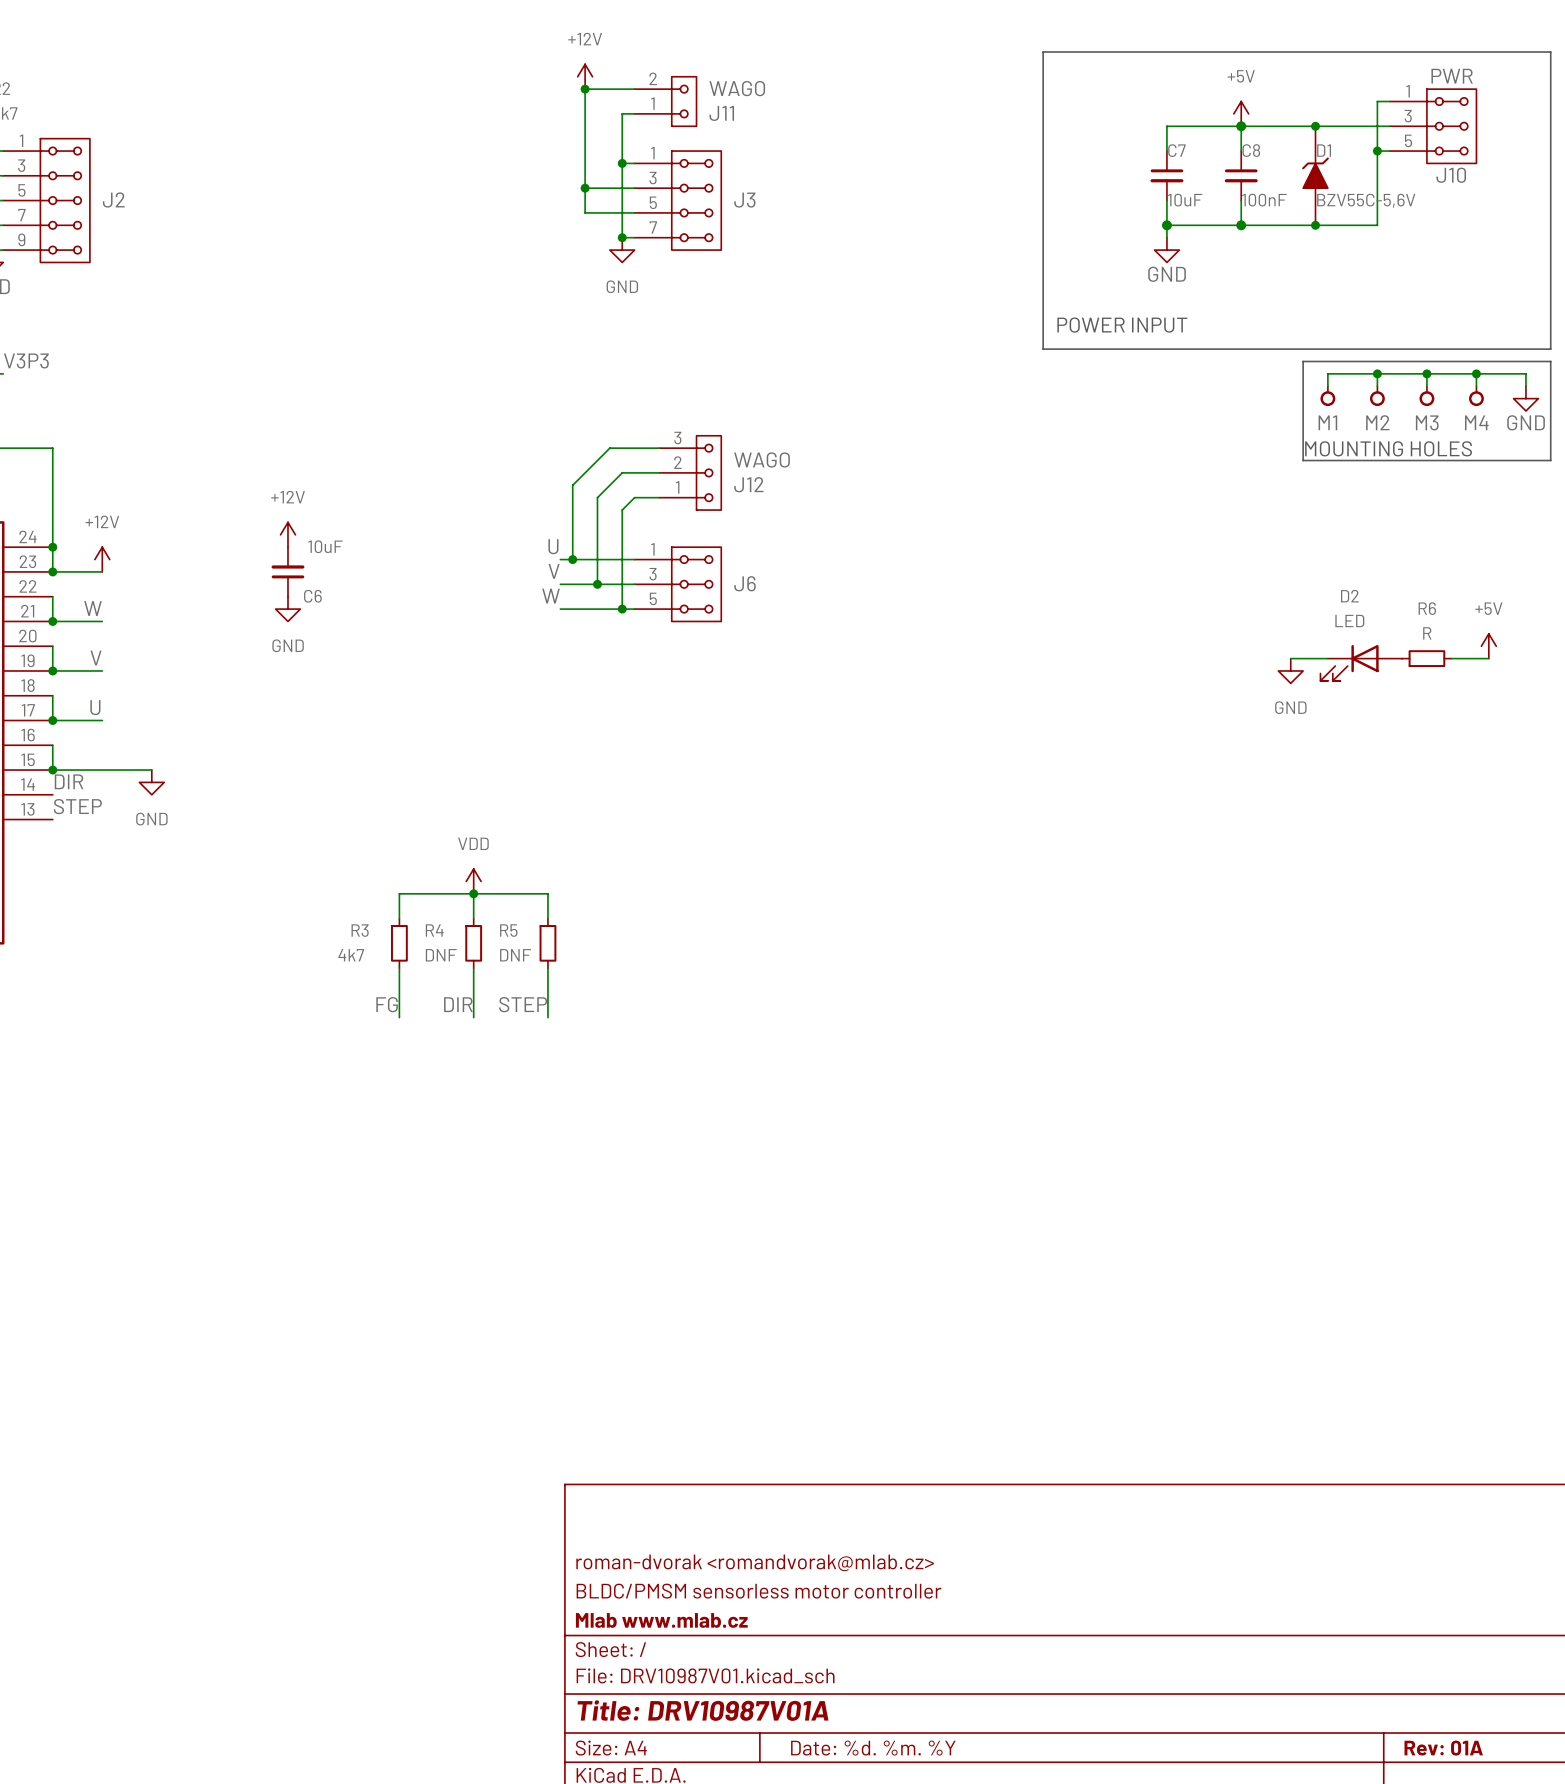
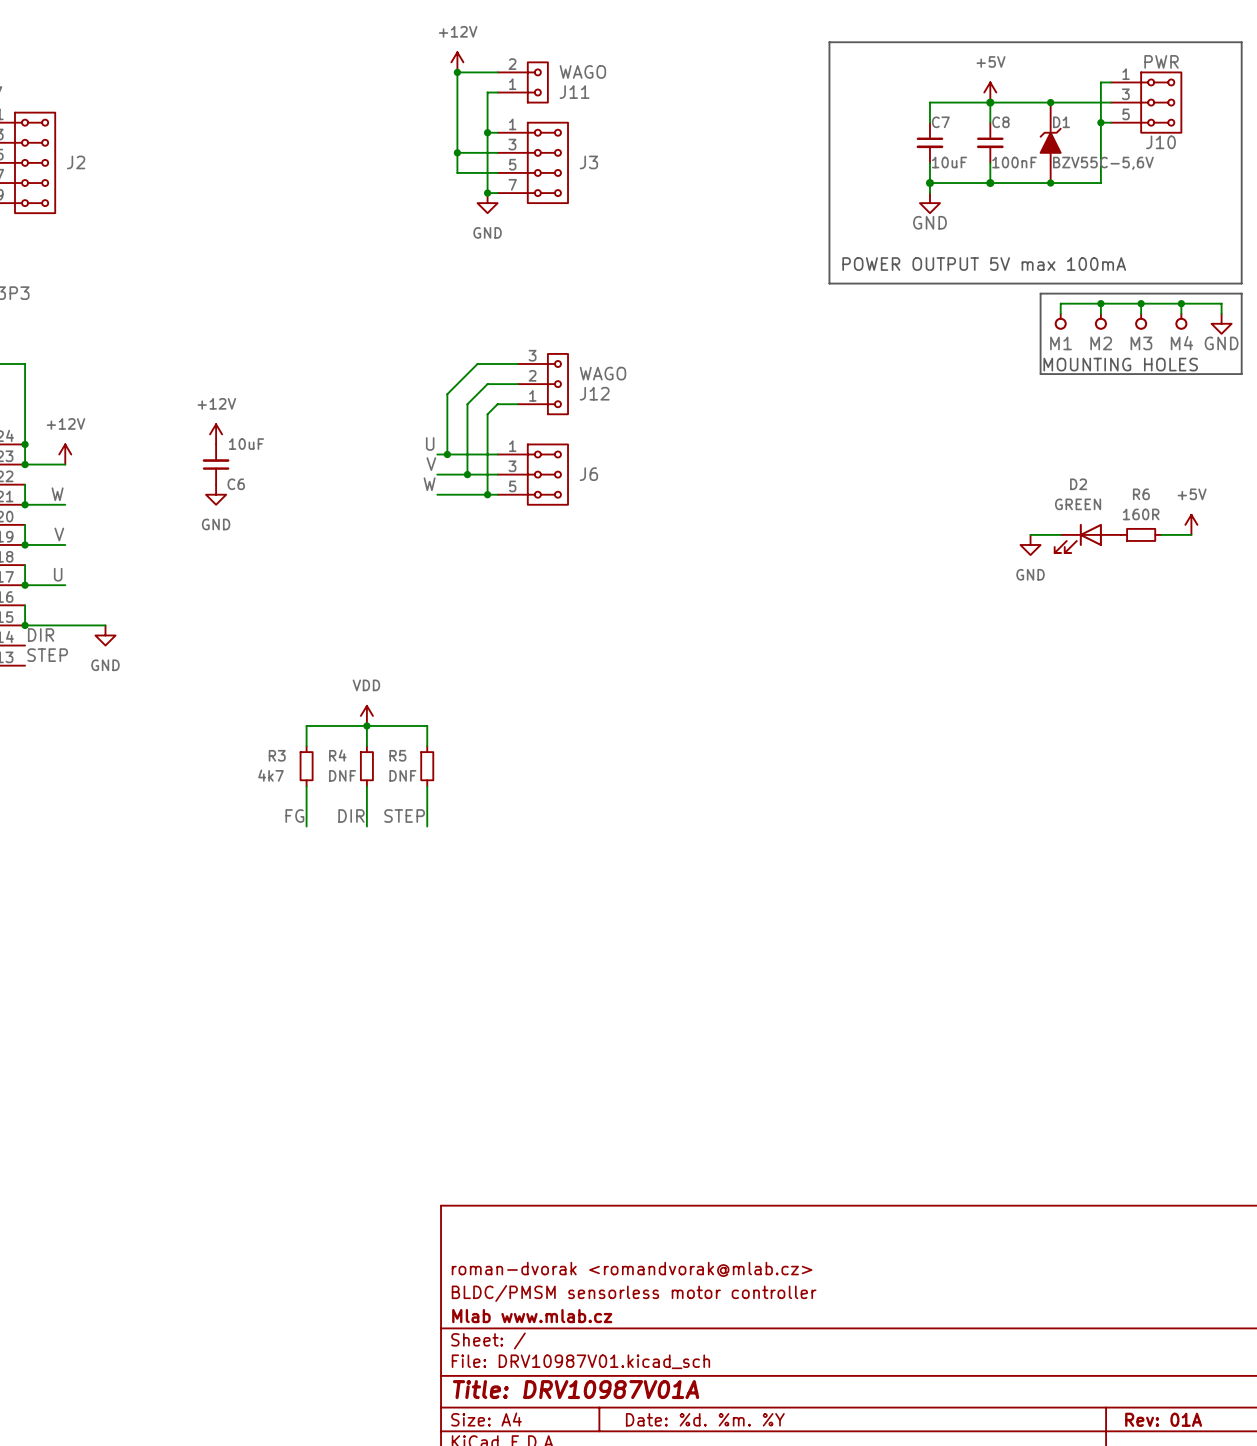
text: POWER INPUT (1122, 325) -> POWER OUTPUT 5V max 100mA (984, 264)
D2 value: LED (1349, 621) -> GREEN (1078, 504)
R6 value: R (1427, 633) -> 160R (1141, 514)

